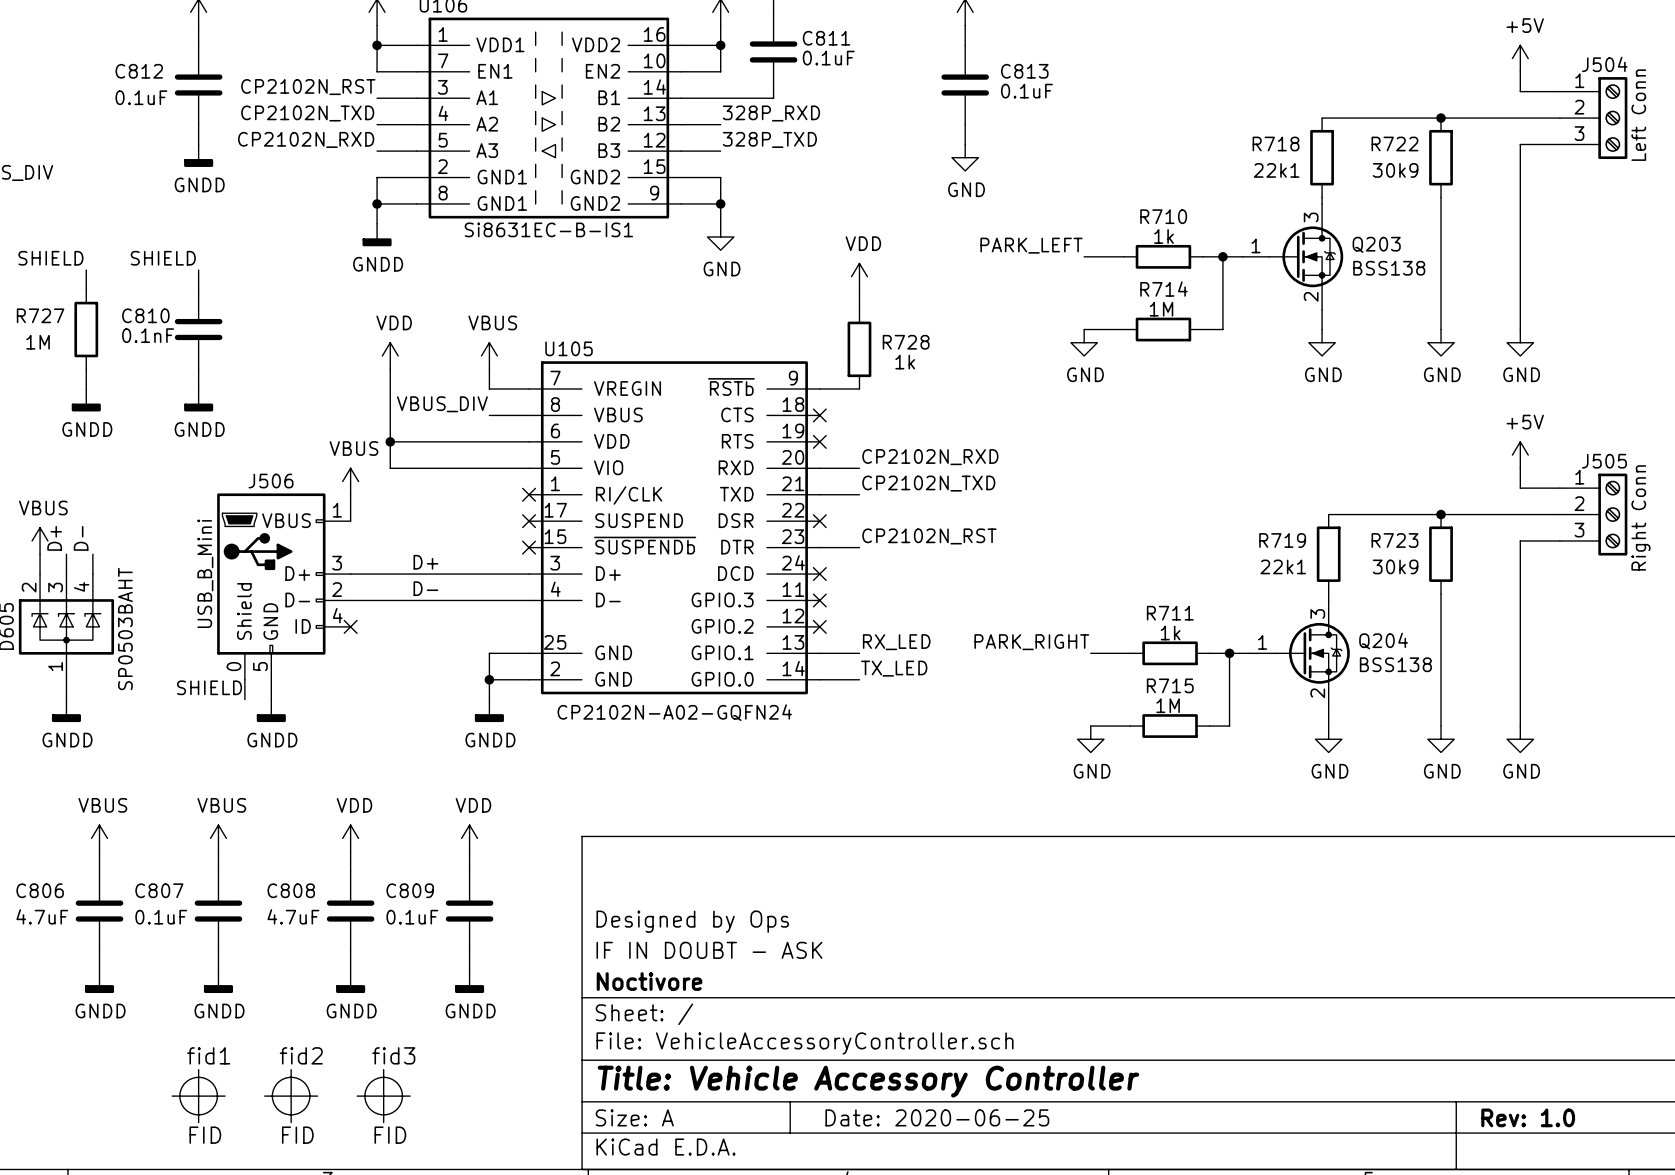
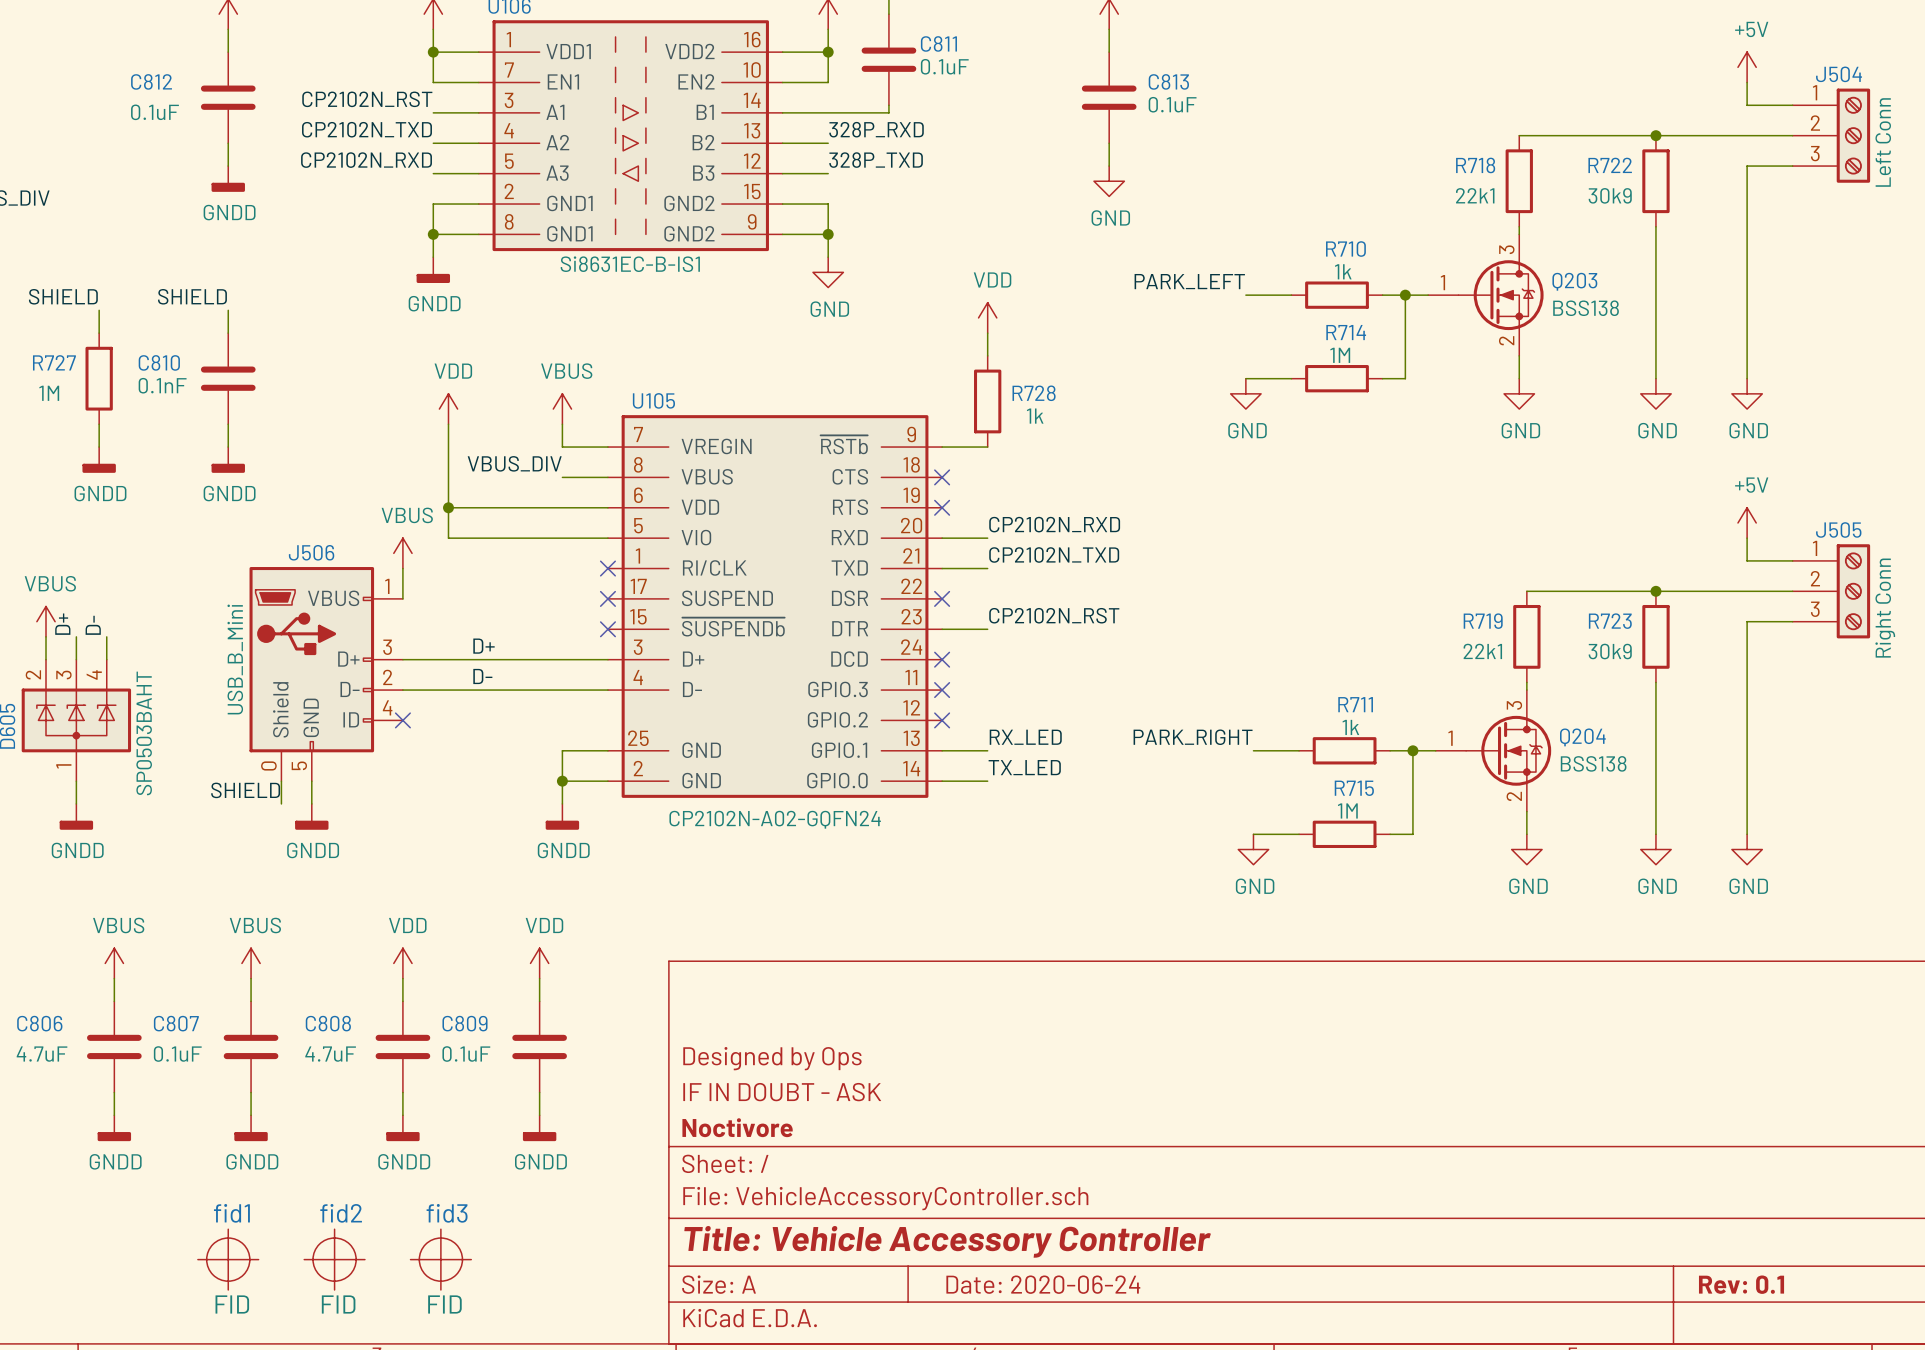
title block: Date: 2020-06-25 (937, 1117) -> Date: 2020-06-24 (1043, 1284)
title block: Rev: 1.0 (1528, 1117) -> Rev: 0.1 (1741, 1284)

